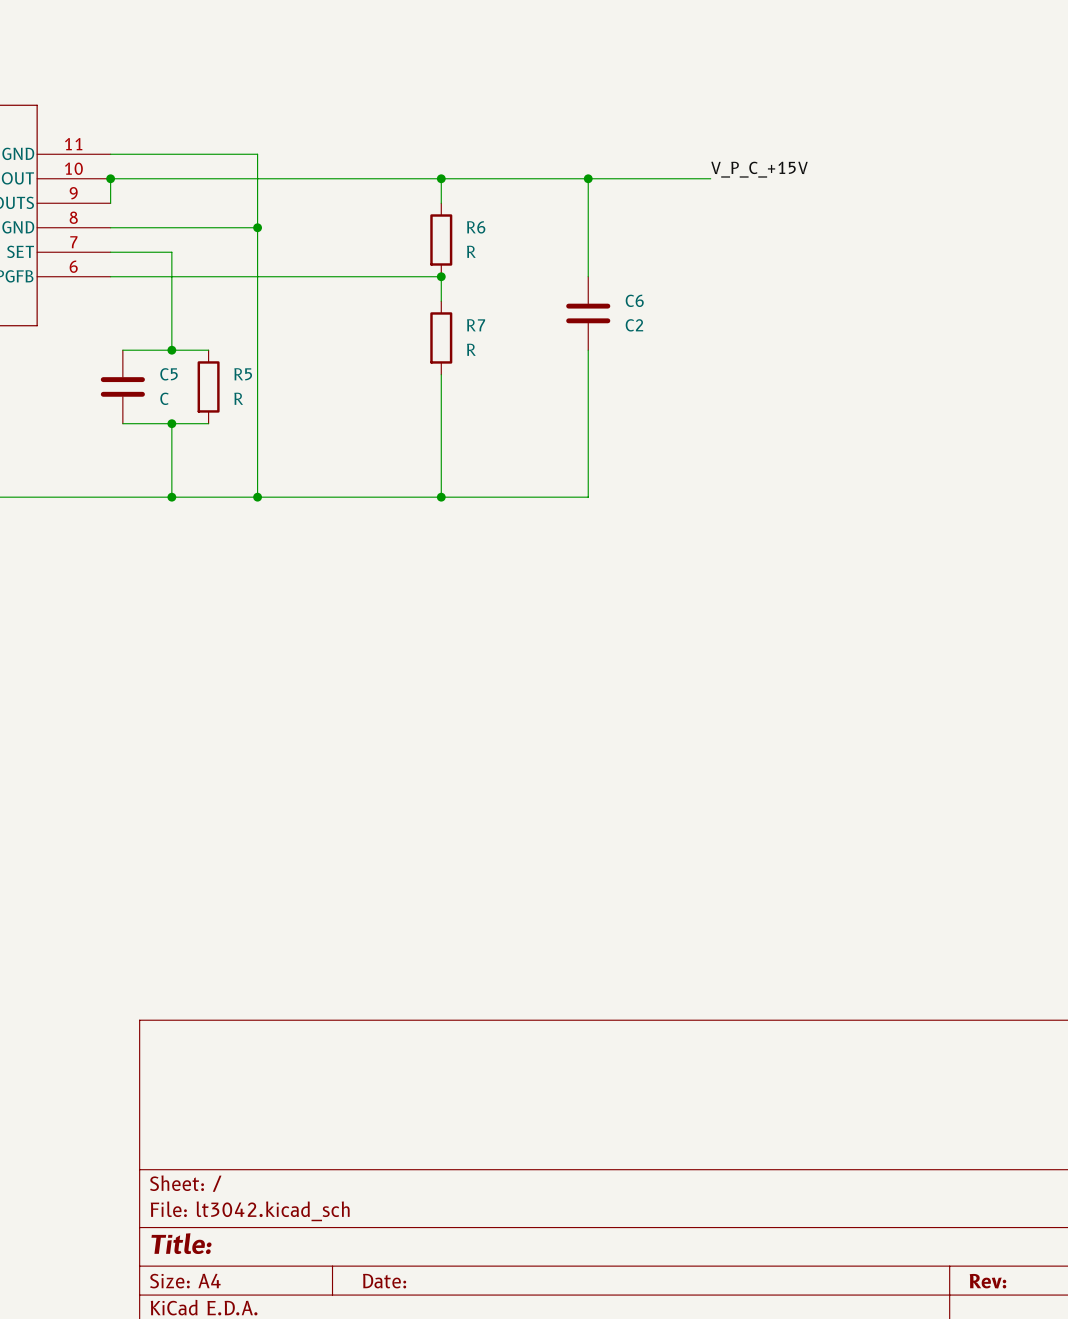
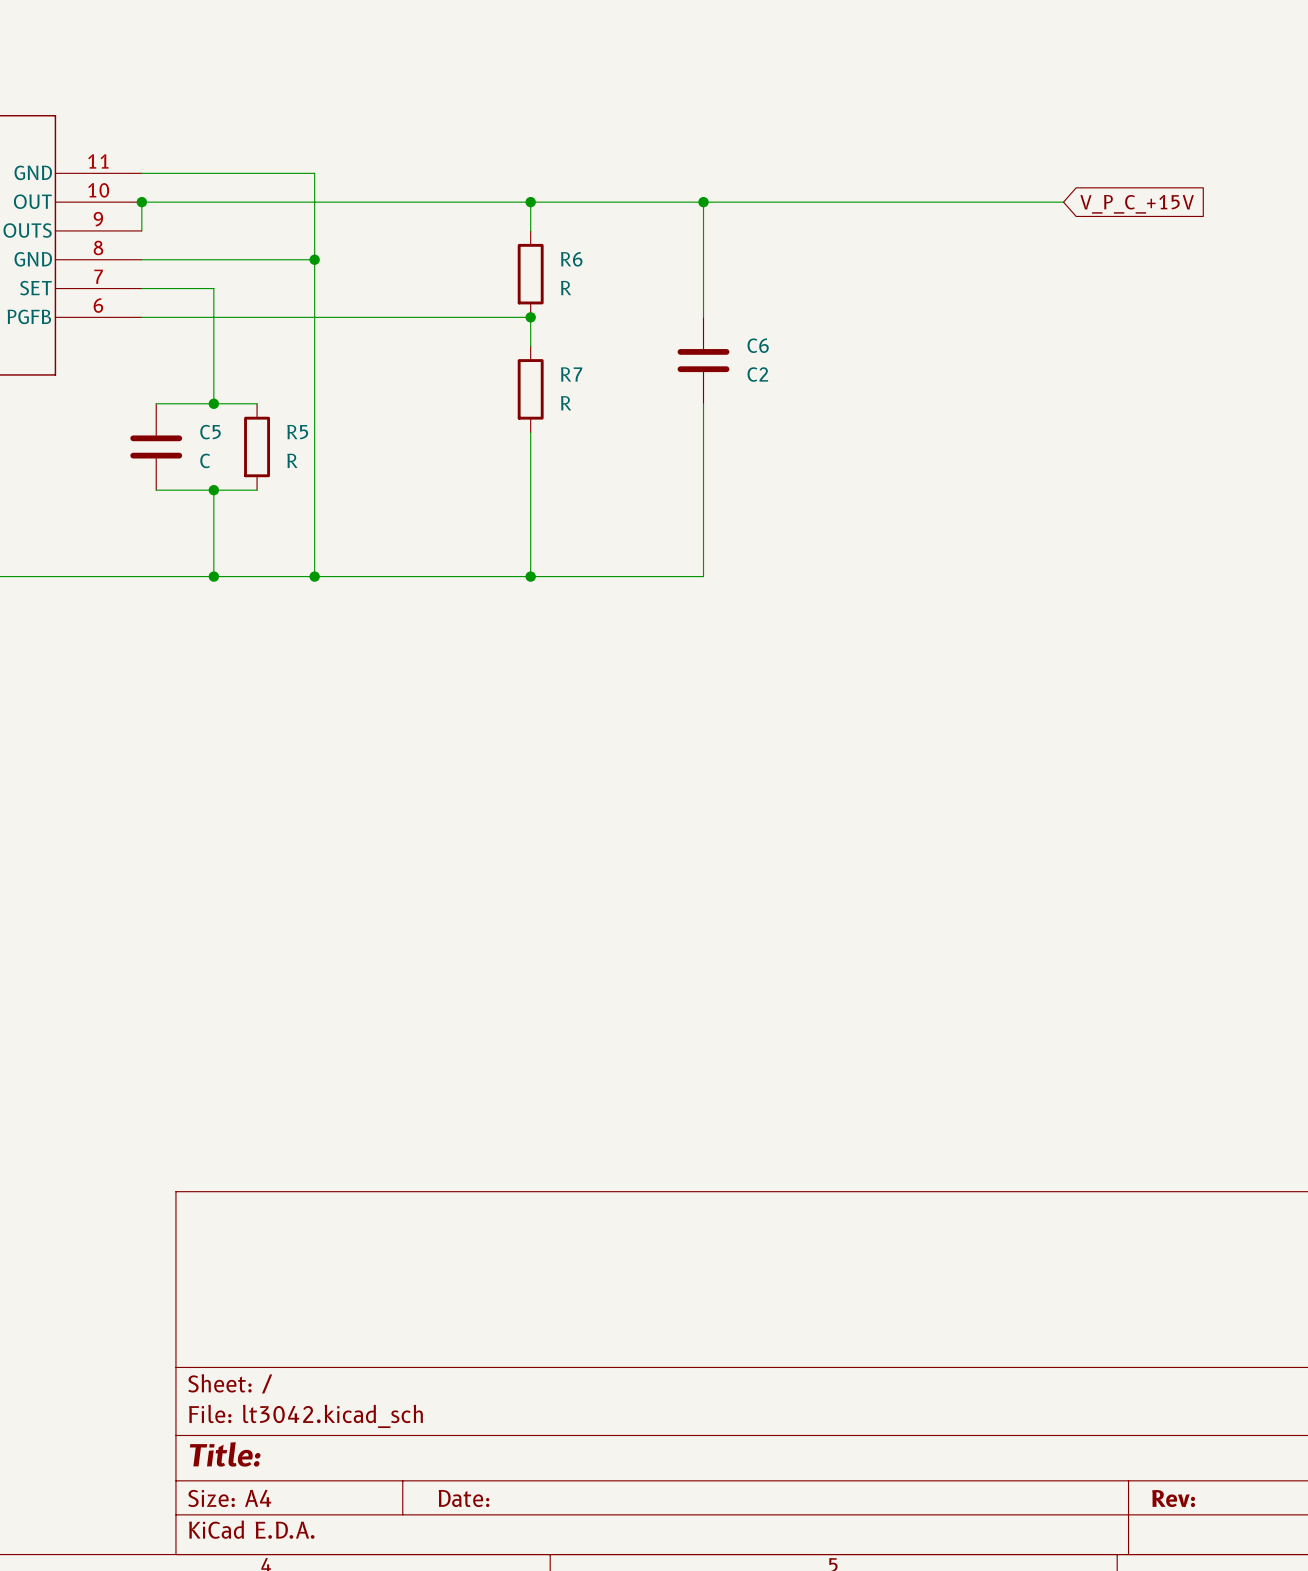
label: V_P_C_+15V (759, 169) -> none
wire: none -> (847, 202) (1063, 202)
global label: none -> V_P_C_+15V (1137, 204)

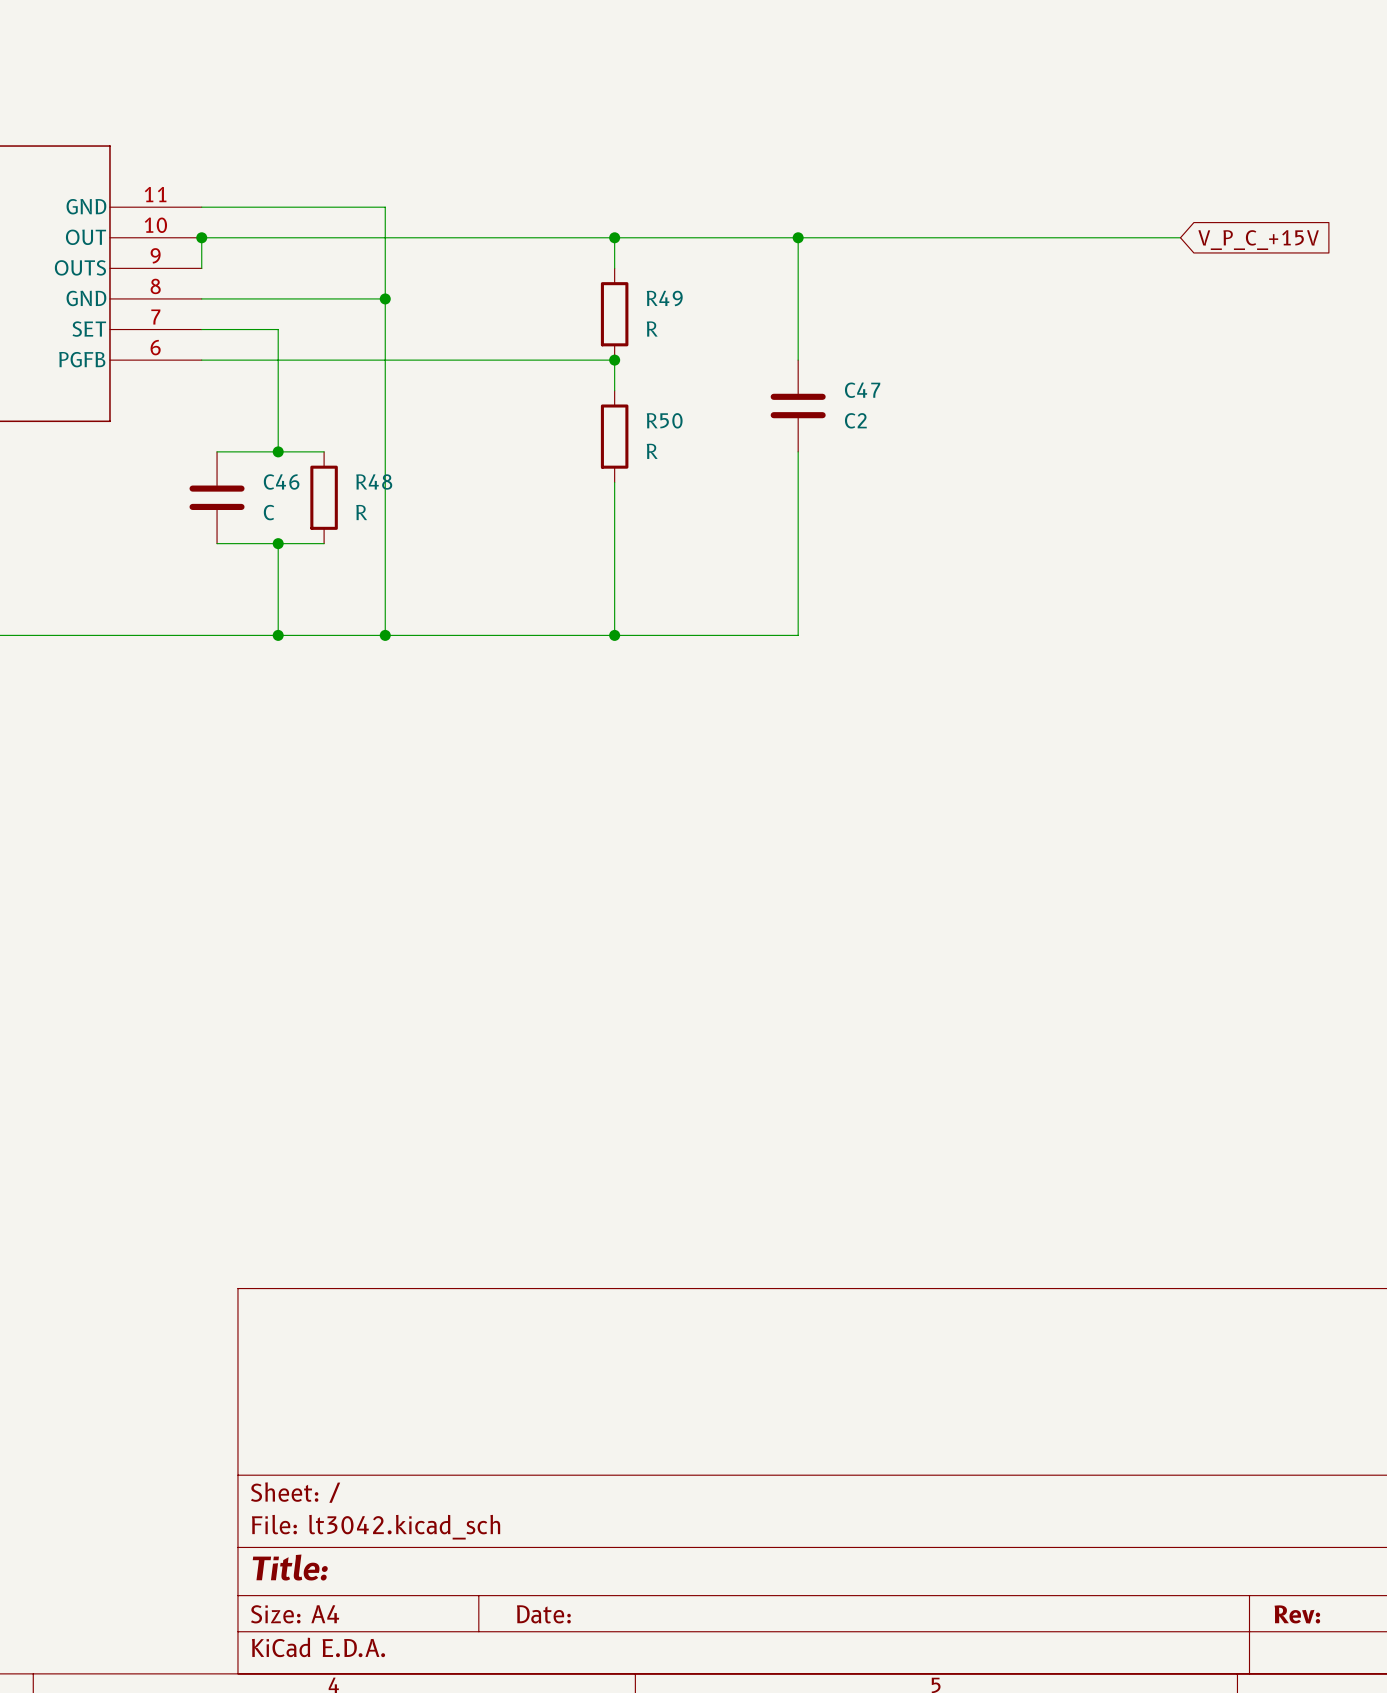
R6 name: R6 (571, 259) -> R49 (664, 298)
C6 name: C6 (758, 345) -> C47 (862, 390)
R7 name: R7 (571, 374) -> R50 (664, 420)
C5 name: C5 (210, 432) -> C46 (281, 481)
R5 name: R5 (297, 432) -> R48 (374, 481)

